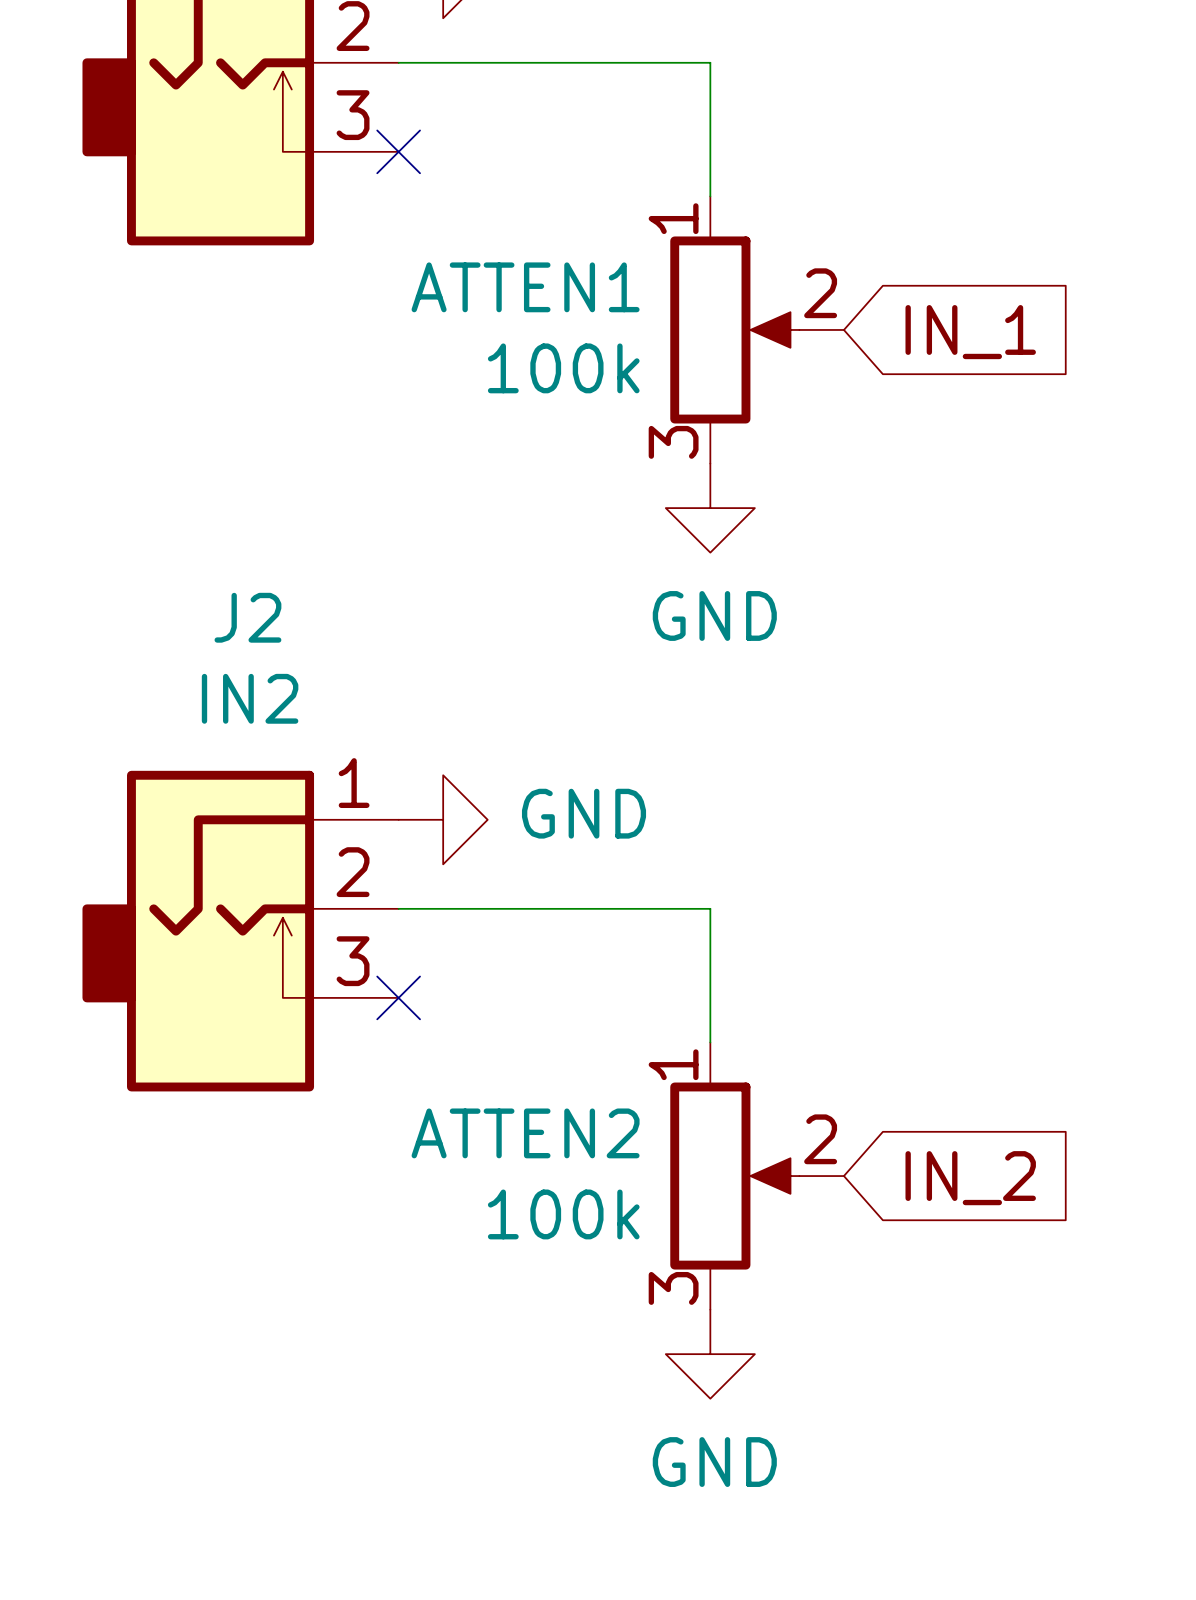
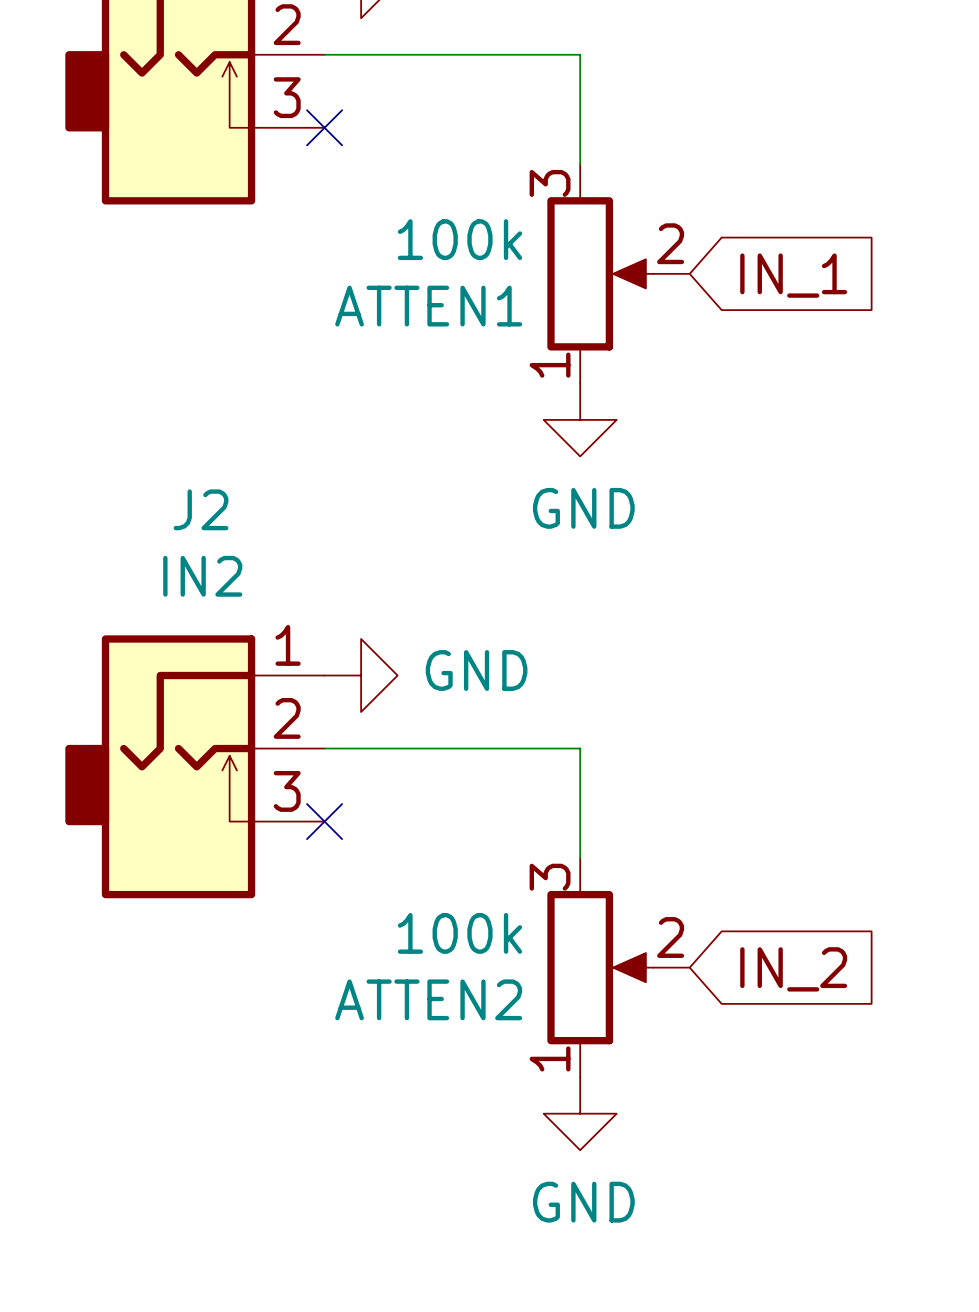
ATTEN1 flip: as is (734, 329) -> up-down (600, 273)
ATTEN2 flip: as is (734, 1176) -> up-down (600, 967)

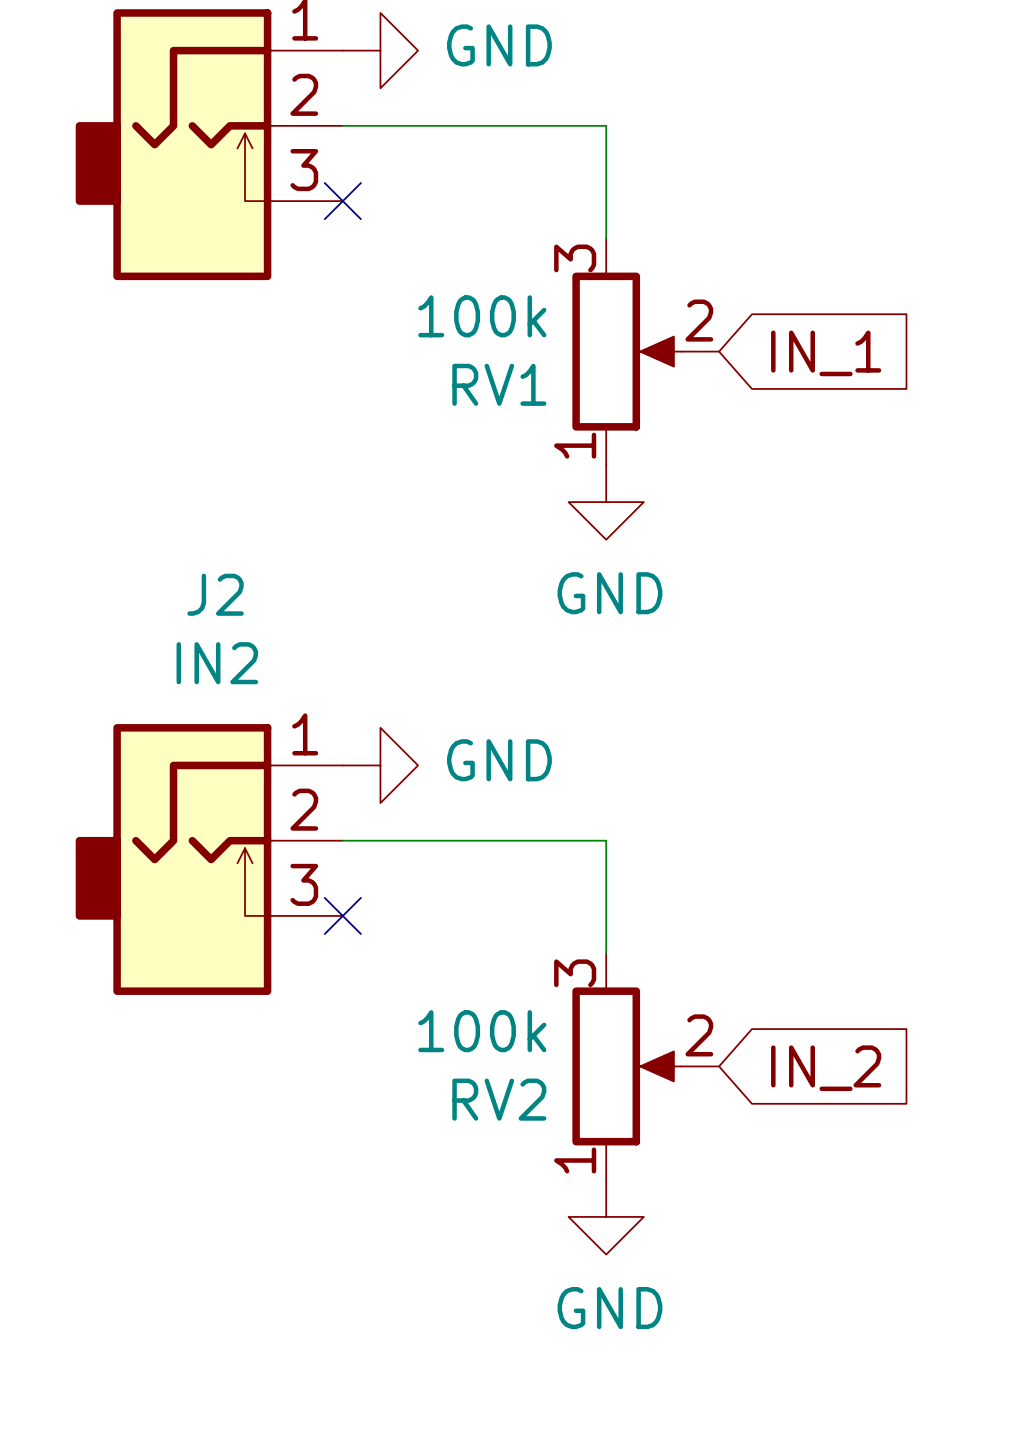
ATTEN1 name: ATTEN1 (428, 306) -> RV1 (499, 384)
ATTEN2 name: ATTEN2 (428, 999) -> RV2 (499, 1099)

